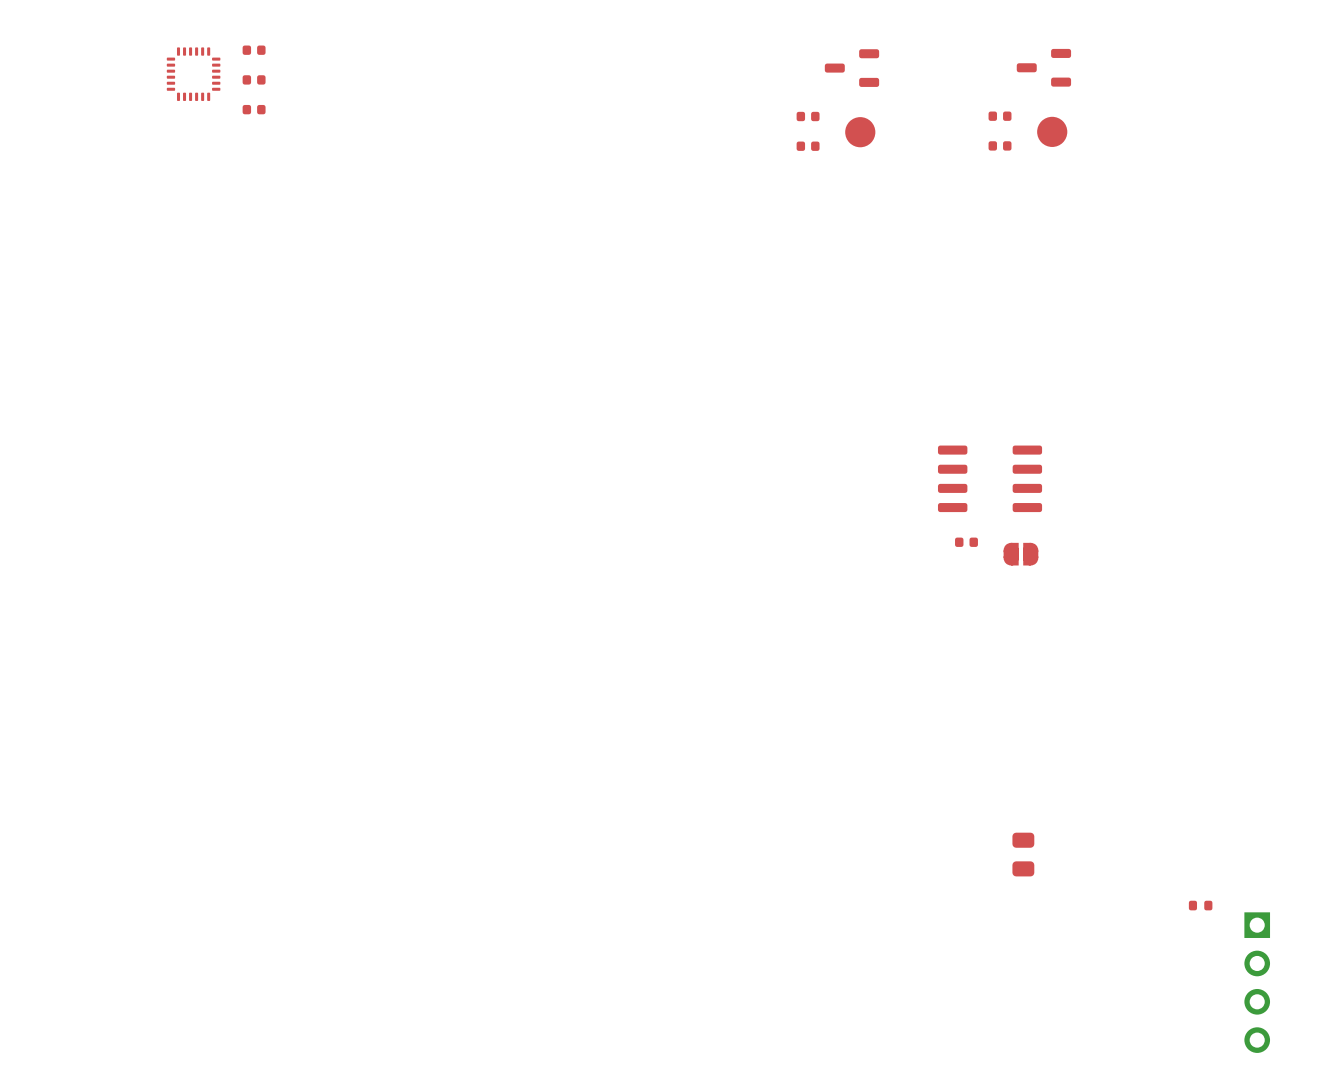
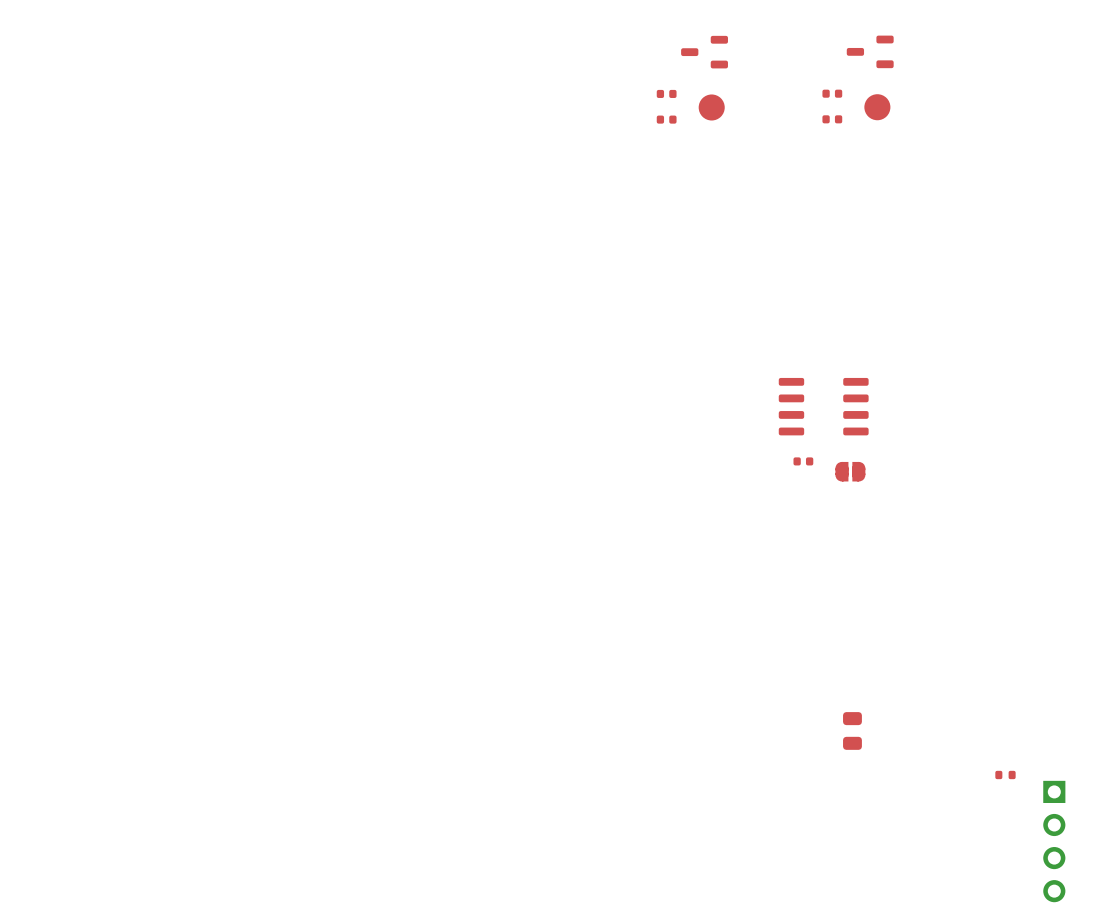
part: (254, 50) -> none
part: (193, 74) -> none
part: (254, 79) -> none
part: (254, 109) -> none

